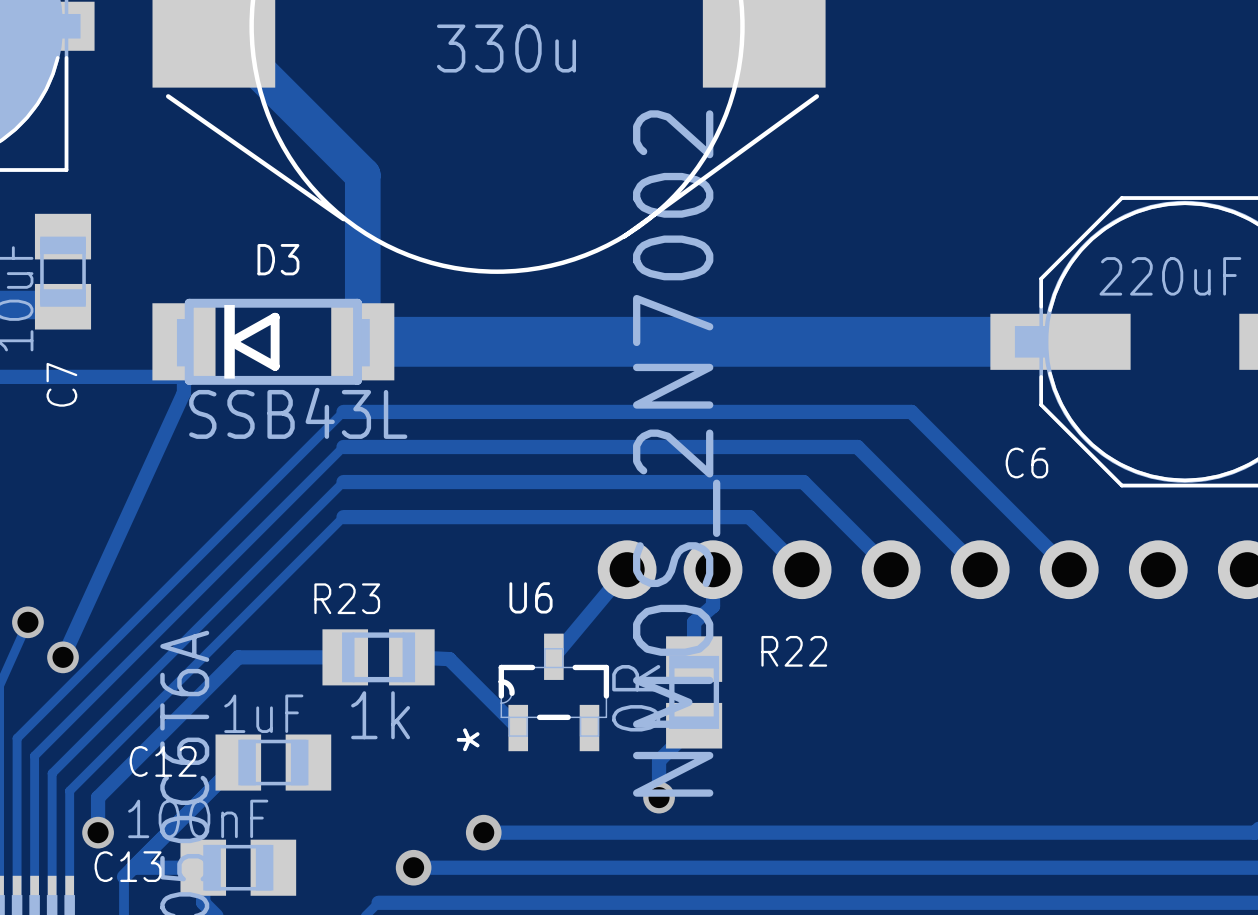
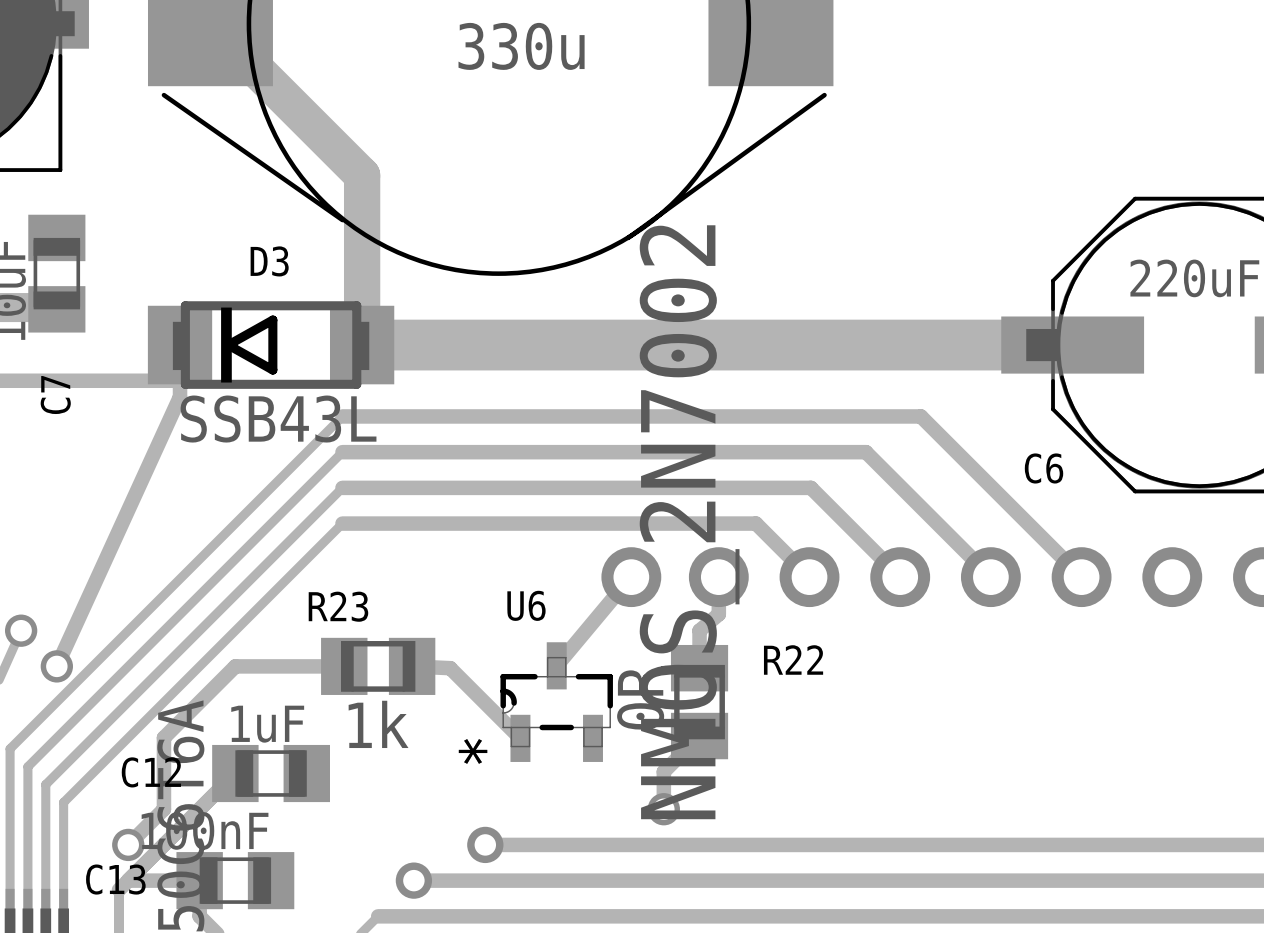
track: (168, 727) (98, 797) (98, 832) -> (163, 737) (163, 809) (128, 844)
via position: (98, 832) -> (128, 844)

